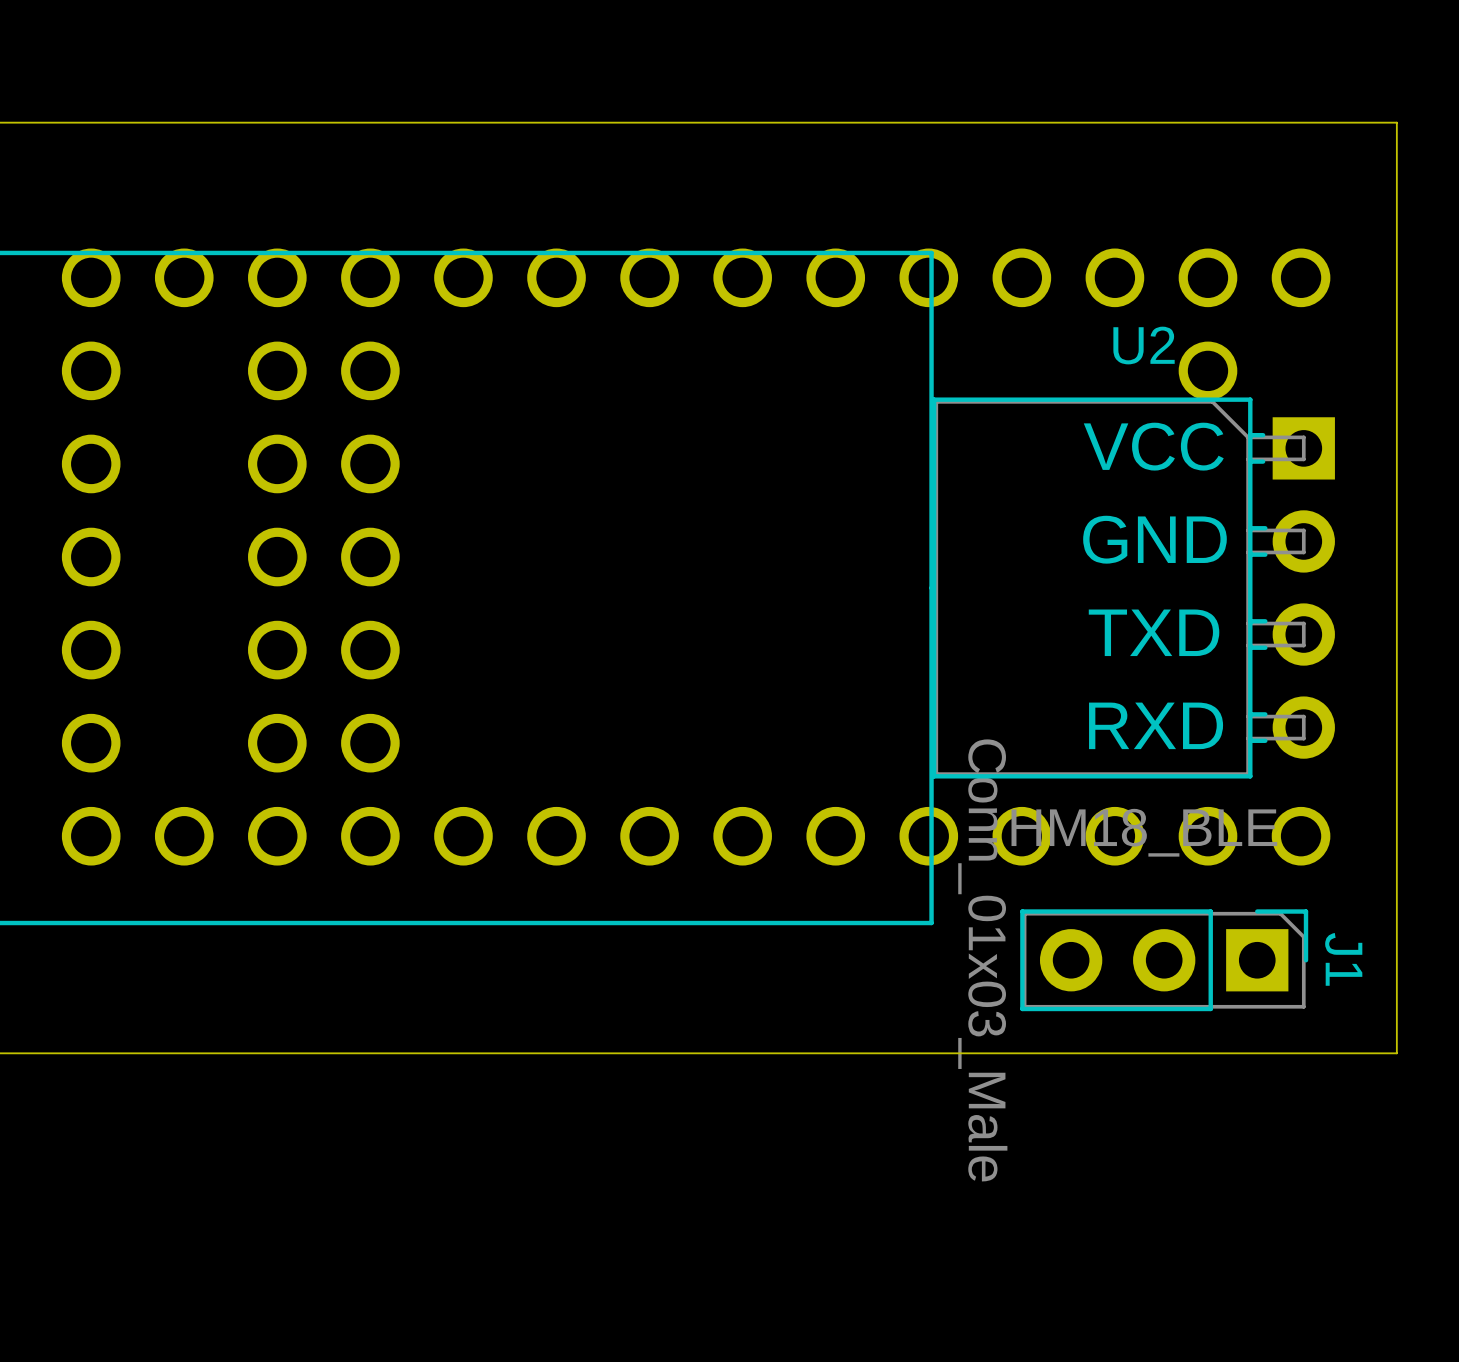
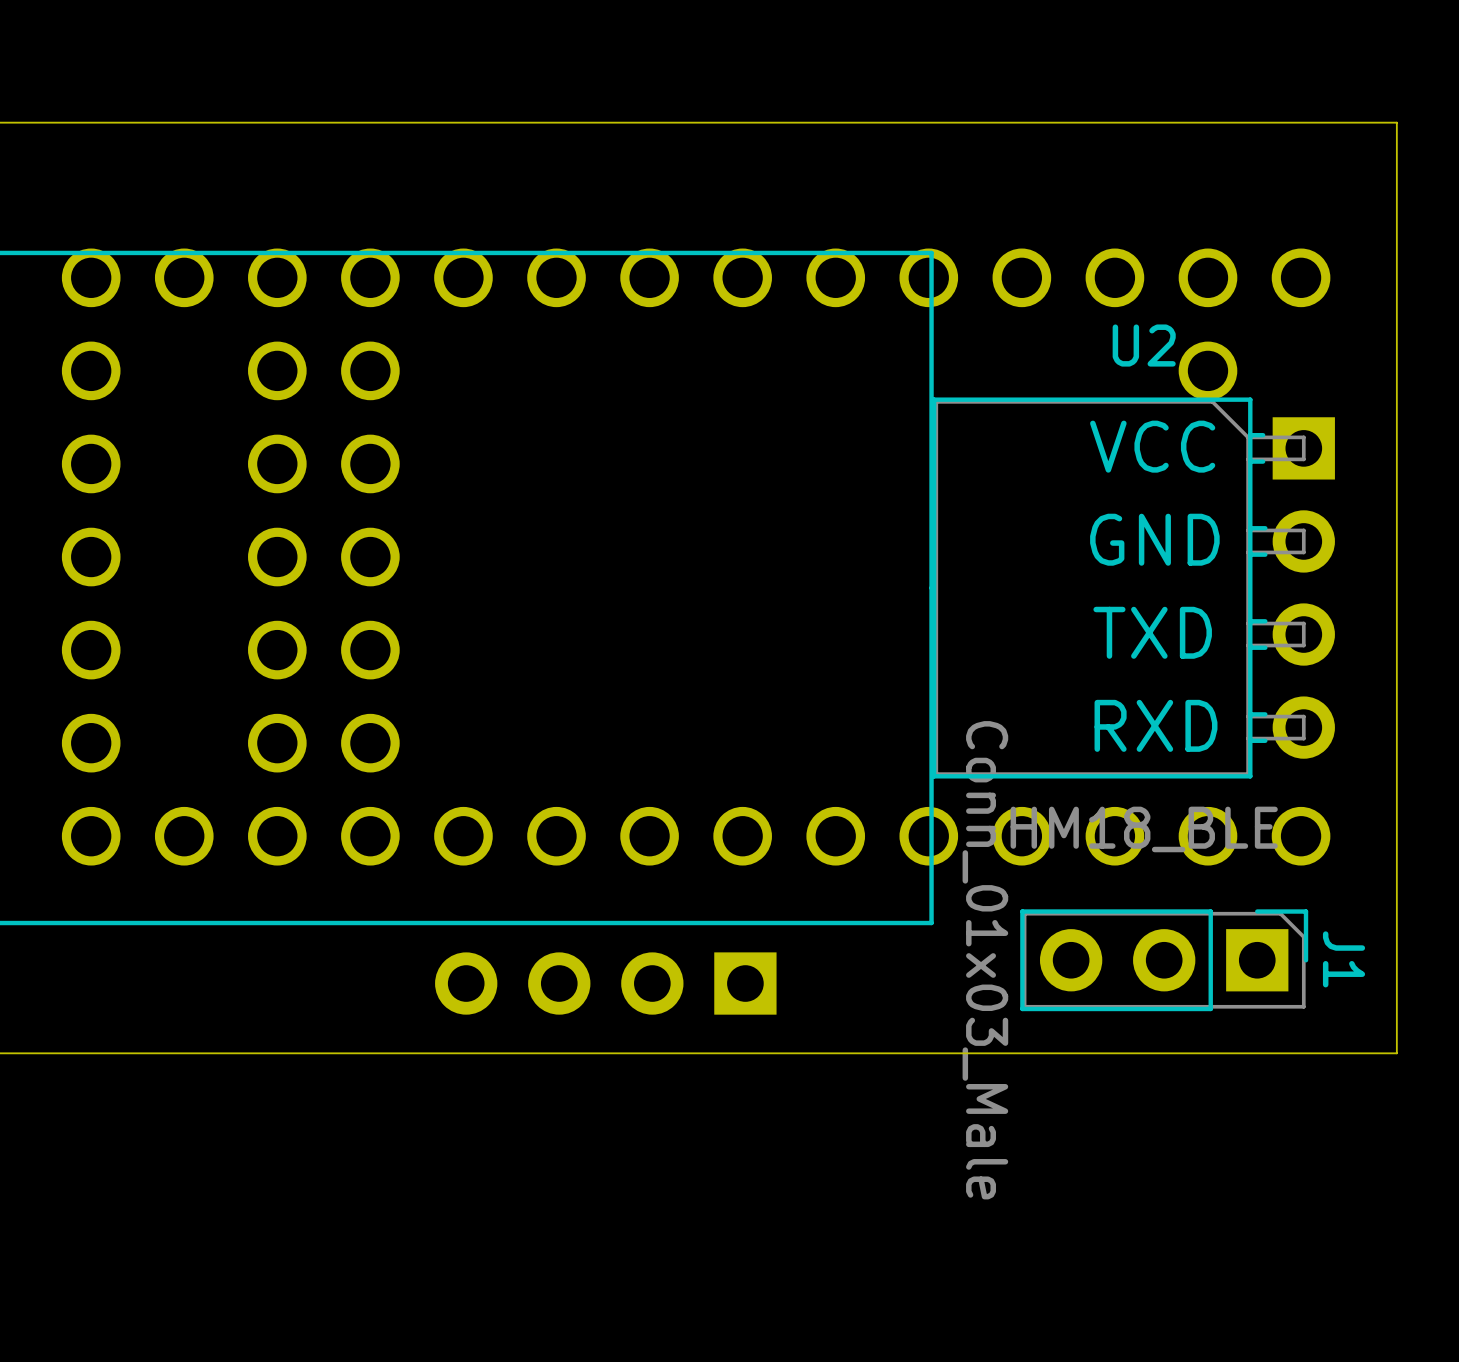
part: none -> (605, 983)

